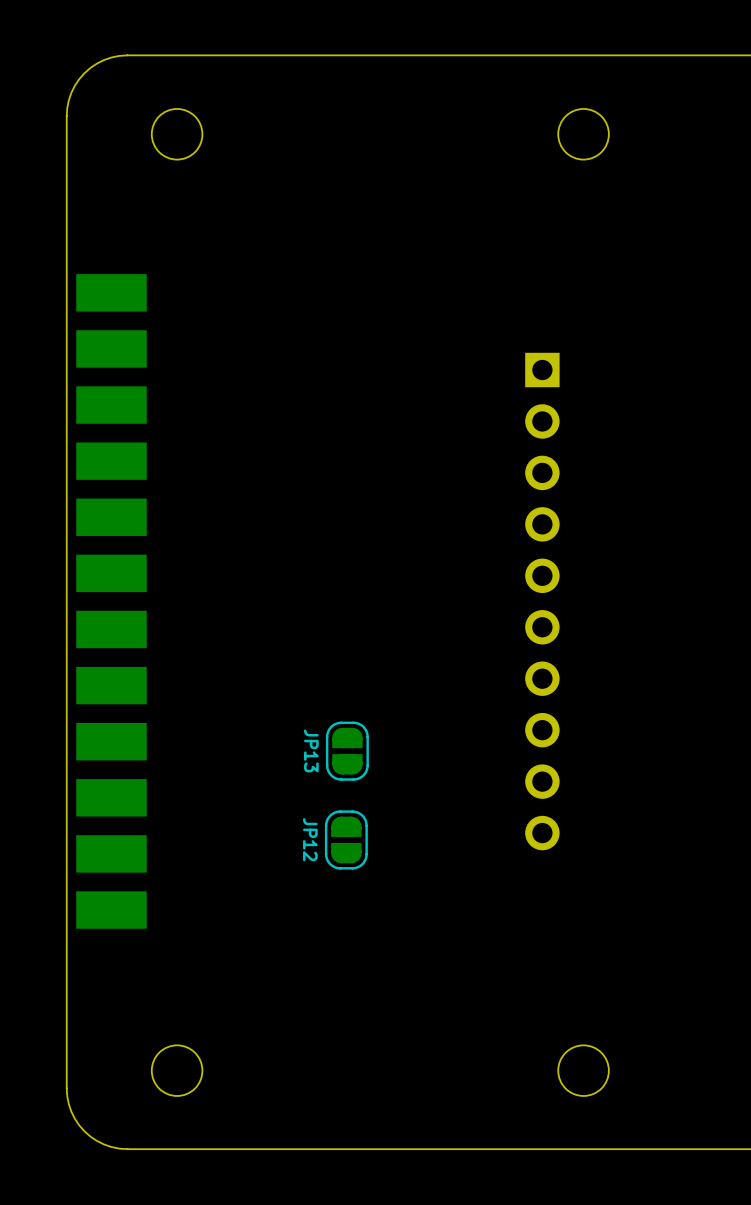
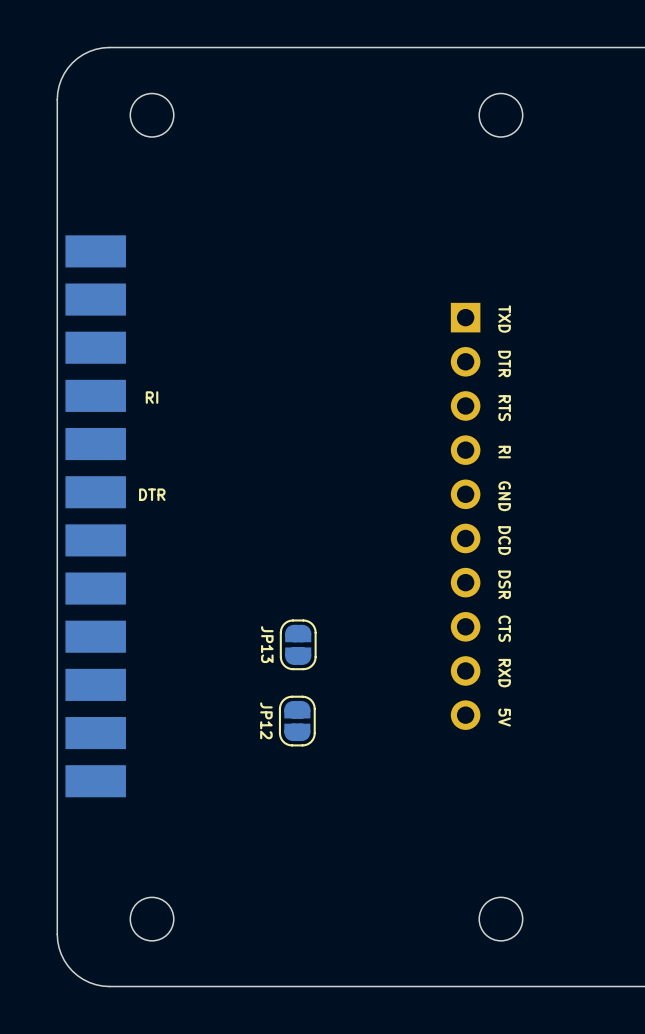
text: none -> TXD (504, 319)
text: none -> DTR (504, 363)
text: none -> RI (152, 397)
text: none -> RTS (504, 408)
text: none -> RI (504, 452)
text: none -> DTR (152, 494)
text: none -> GND (504, 496)
text: none -> DCD (504, 540)
text: none -> DSR (504, 584)
text: none -> CTS (504, 628)
text: none -> RXD (504, 673)
text: none -> 5V (504, 717)

